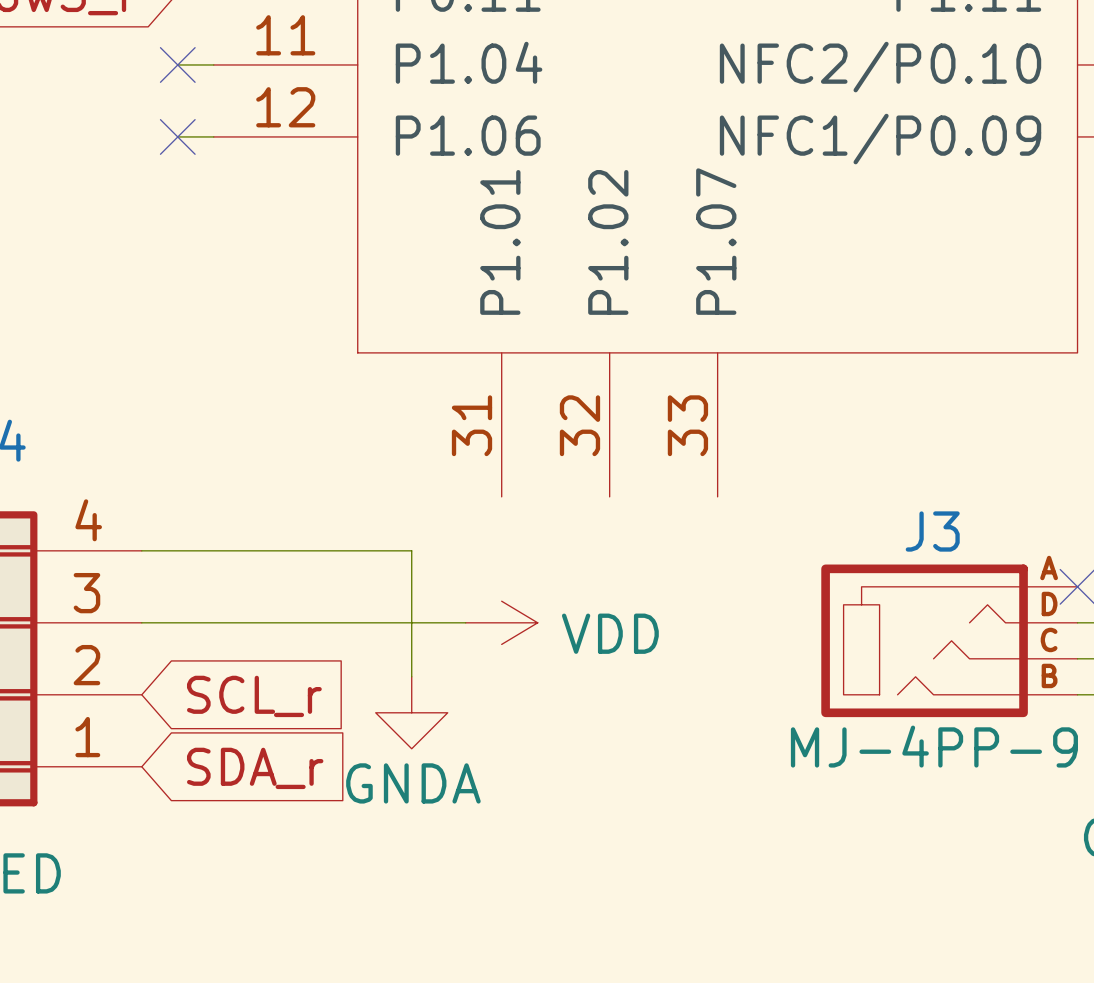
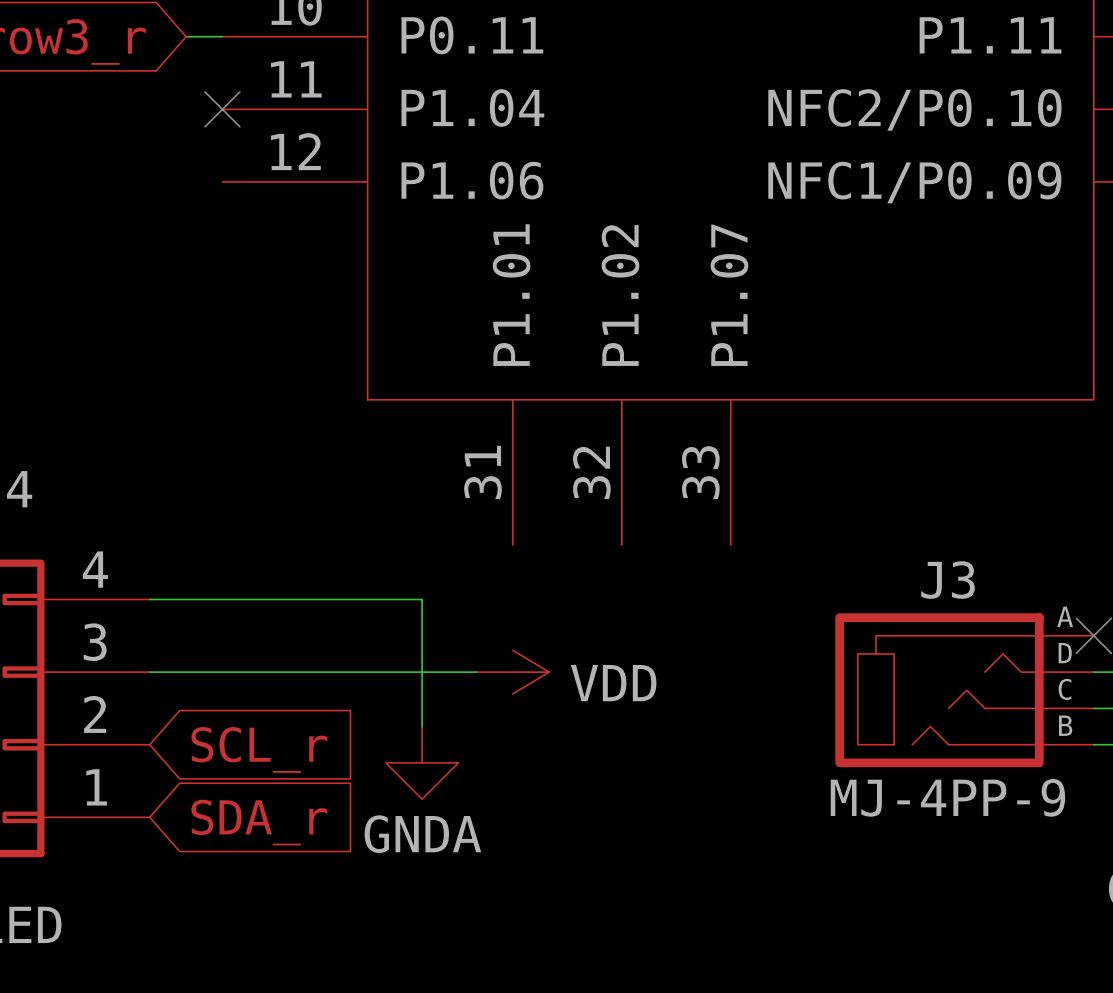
wire: (177, 64) (213, 64) -> none
no-connect mark position: (177, 64) -> (222, 109)
wire: (177, 136) (213, 136) -> none
no-connect mark: (177, 136) -> none

